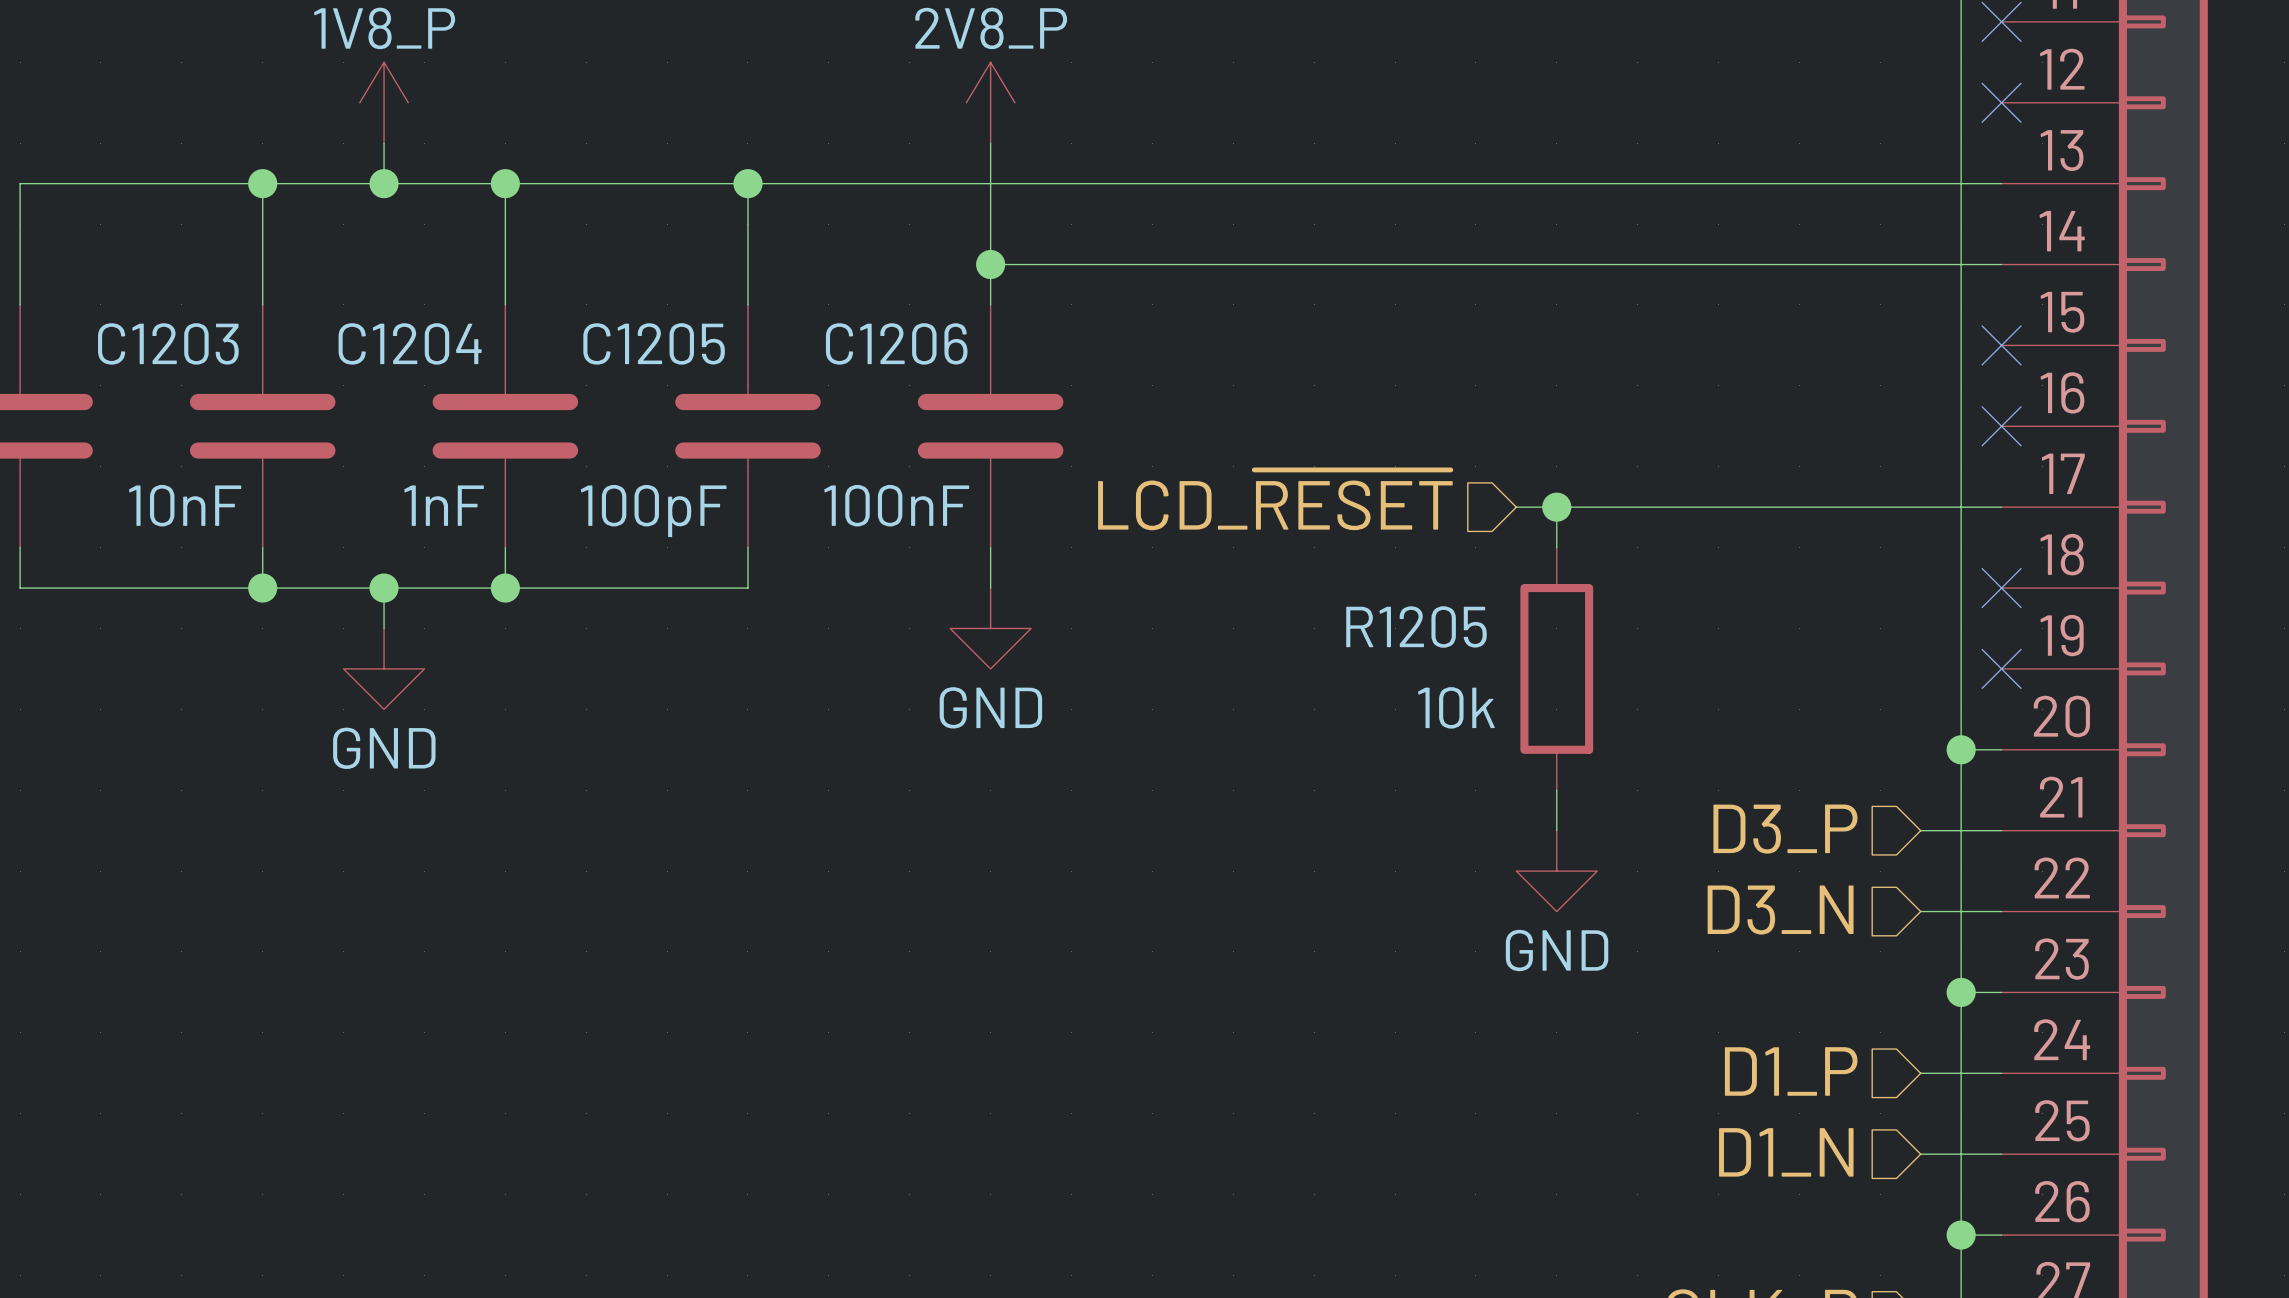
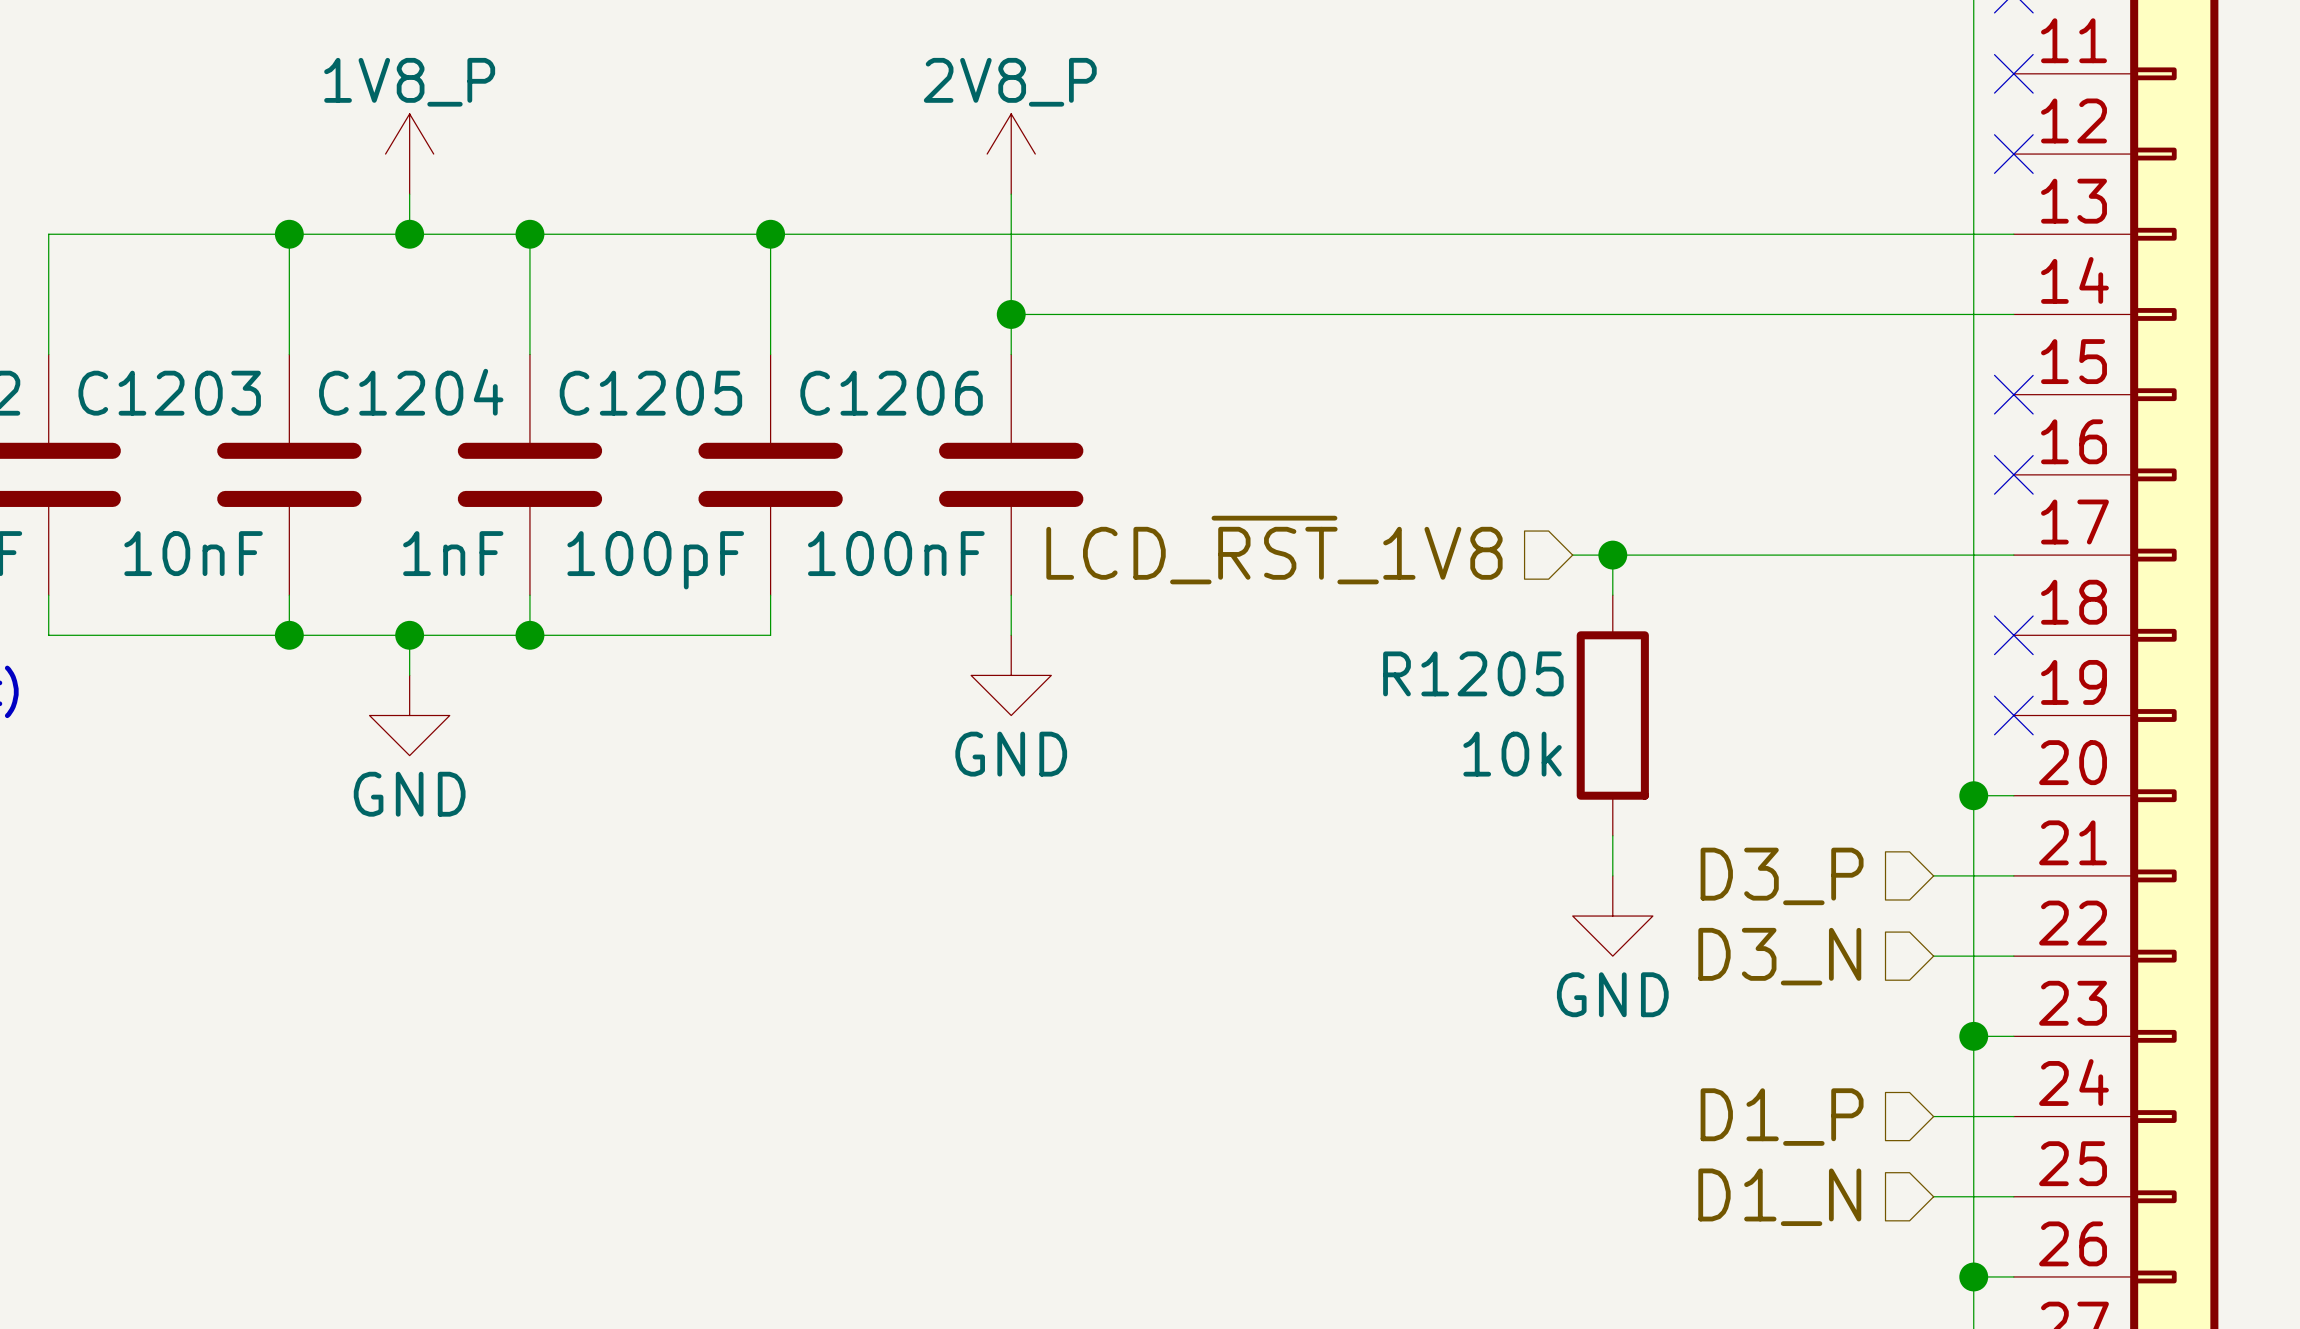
hierarchical label: LCD_~{RESET} (1275, 500) -> LCD_~{RST}_1V8 (1274, 550)
wire: (1516, 507) (1556, 507) (1556, 547) -> none
junction position: (1556, 507) -> (1612, 555)
wire: none -> (1612, 555) (1612, 595)
R1205 position: (1556, 668) -> (1612, 715)
wire: (1556, 790) (1556, 830) -> (1612, 835) (1612, 875)
power symbol position: GND (1556, 871) -> GND (1612, 916)

